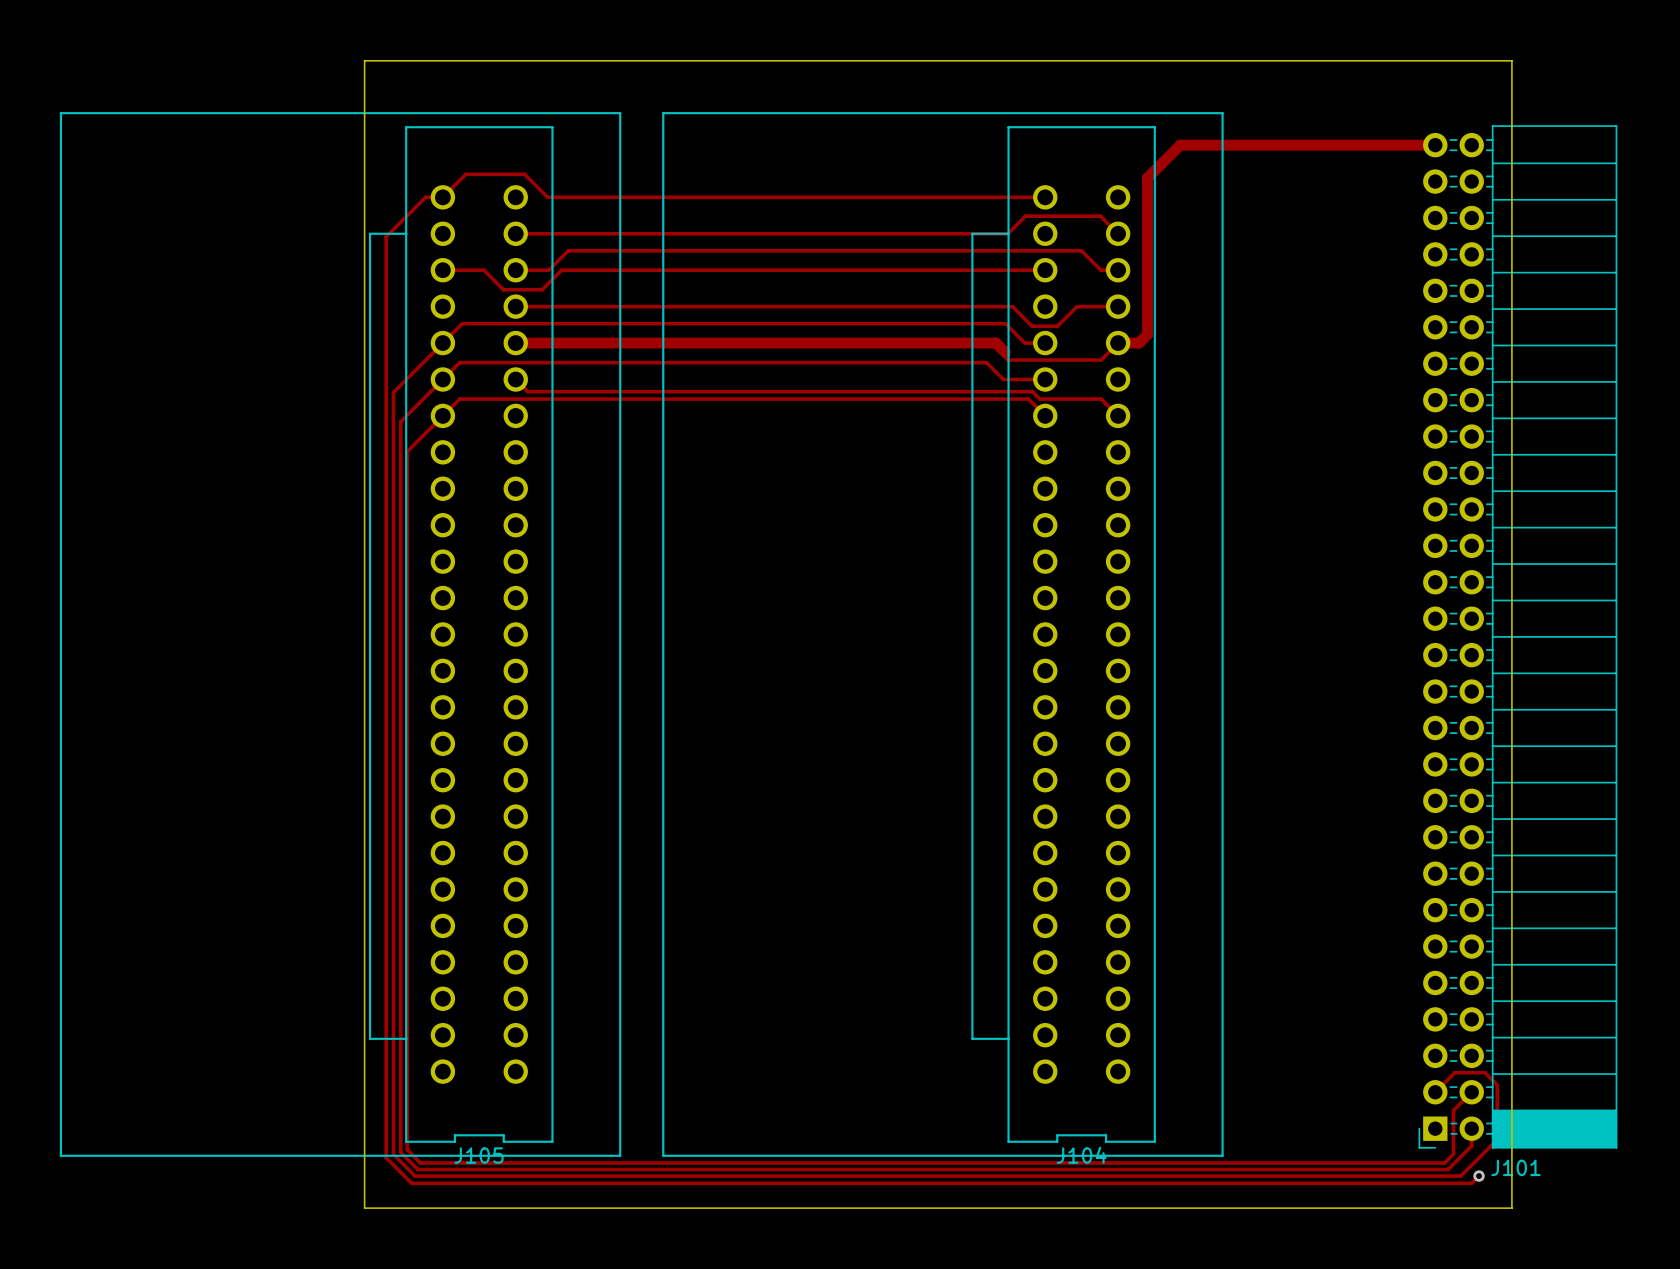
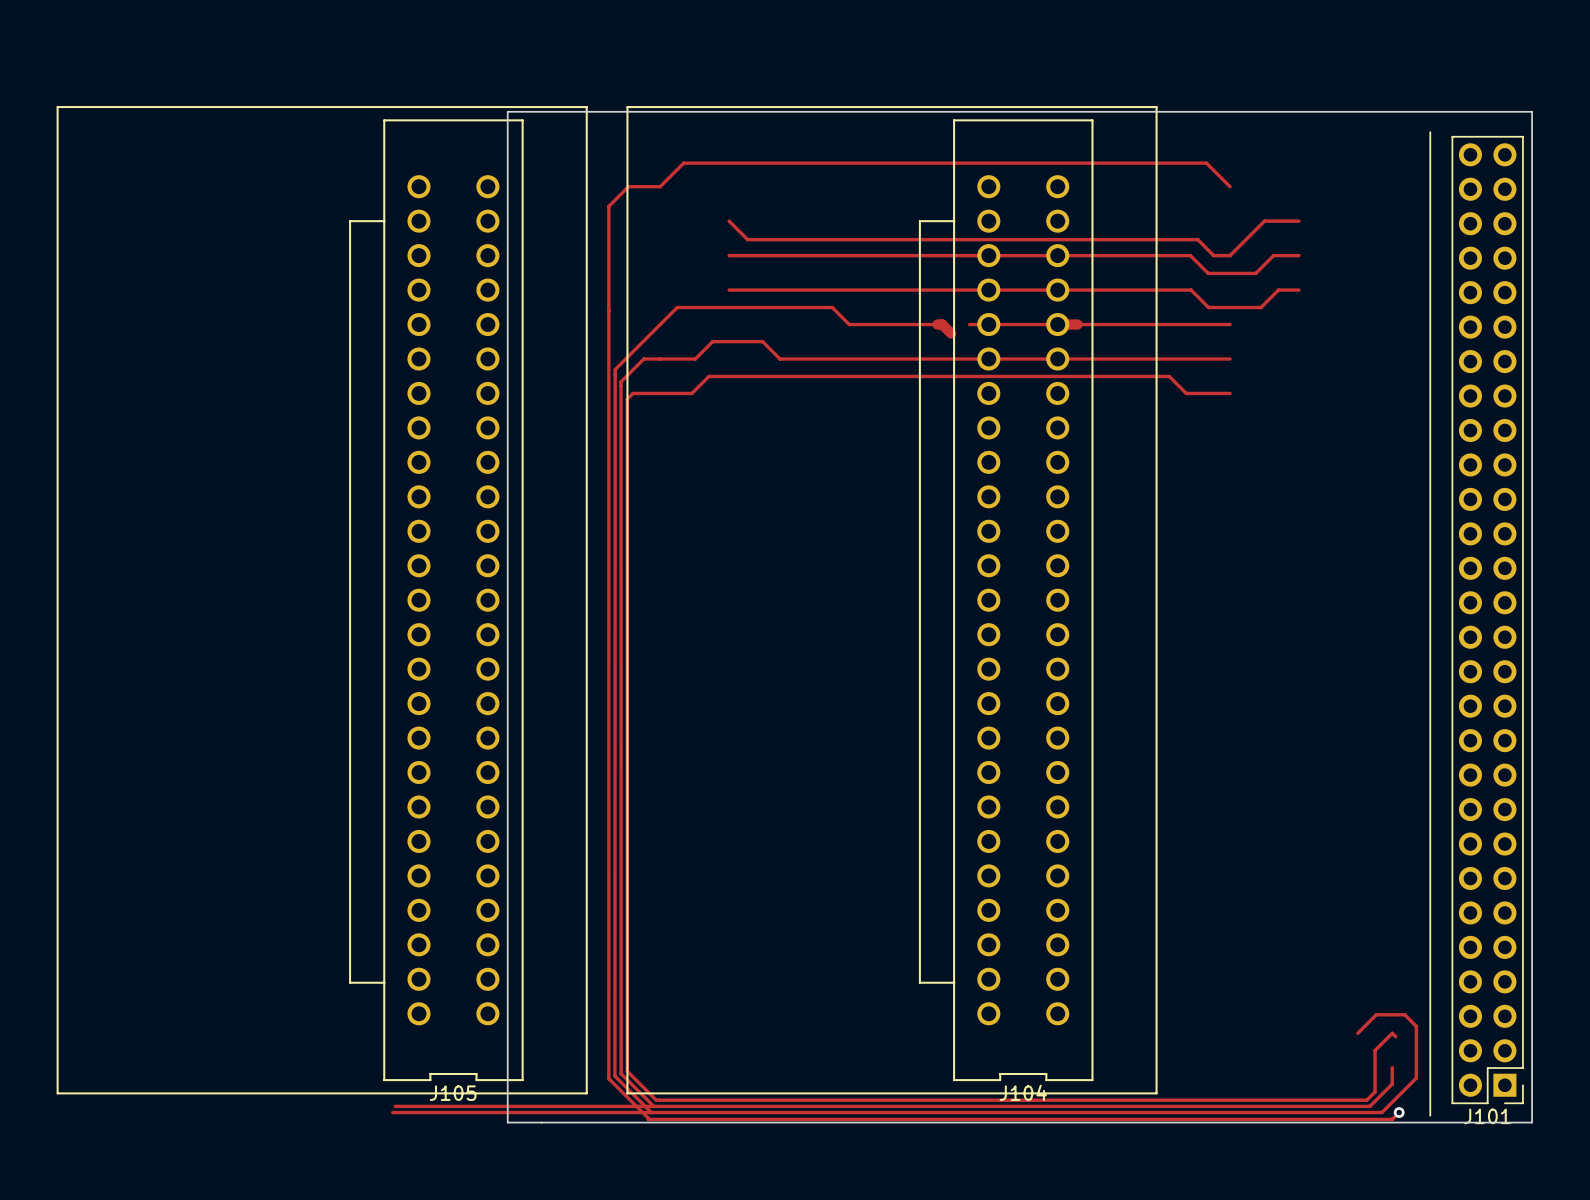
board edge: (364, 60) (1511, 60) (1511, 1208) (364, 1208) (364, 60) -> (507, 111) (507, 1122) (1532, 1122) (1532, 111) (507, 111)
J101 footprint: [1418, 125, 1618, 1149] -> [1451, 135, 1524, 1105]
line: none -> (1430, 132) (1430, 1115)
track: (1435, 145) (1180, 145) (1147, 177) (1147, 334) (1139, 343) -> (1230, 324) (1077, 324)
track: (664, 197) (547, 197) (524, 174) (465, 174) (442, 197) (425, 197) (386, 236) (386, 1157) (411, 1183) (685, 1183) -> (628, 186) (608, 206) (608, 1078) (648, 1119)
track: (697, 197) (1045, 197) -> (660, 186) (683, 163) (1206, 163) (1230, 186)
track: (515, 233) (1007, 233) (1025, 216) (1100, 216) (1118, 233) -> none
track: none -> (729, 221) (747, 239) (1197, 239) (1213, 255) (1230, 255) (1264, 221) (1298, 221)
track: (442, 270) (483, 270) (503, 289) (542, 289) (561, 270) (770, 270) -> none
track: (515, 270) (548, 270) (568, 250) (1081, 250) (1100, 270) -> (988, 255) (1041, 255)
track: none -> (1057, 255) (1190, 255) (1208, 273) (1255, 273) (1273, 255) (1298, 255)
track: (515, 306) (770, 306) -> none
track: (1012, 306) (1023, 317) -> none
track: (1077, 306) (1057, 326) (1032, 326) (1023, 317) -> (1018, 290) (957, 290)
track: none -> (1057, 290) (1191, 290) (1208, 307) (1260, 307) (1278, 290) (1298, 290)
track: (897, 343) (515, 343) (991, 343) (1008, 360) (1101, 360) (1118, 343) -> (988, 324) (1057, 324)
track: none -> (849, 324) (832, 307) (677, 307) (615, 369) (614, 1076) (651, 1112)
track: (1024, 343) (1005, 323) (462, 323) (393, 392) (393, 1154) (415, 1176) -> none
track: (515, 379) (527, 391) (1032, 391) (1039, 399) (1101, 399) (1118, 415) -> none
track: (1003, 379) (986, 362) (459, 362) (400, 421) (400, 1152) (417, 1169) -> (949, 358) (780, 358) (762, 341) (712, 341) (695, 358) (643, 358) (621, 381) (621, 1073) (653, 1106)
track: none -> (988, 358) (1230, 358)
track: (1045, 415) (1028, 399) (459, 399) (407, 451) (407, 1149) (420, 1163) (693, 1163) -> (1230, 393) (1186, 393) (1169, 376) (708, 376) (691, 393) (633, 393) (627, 399) (627, 1071) (656, 1100)

